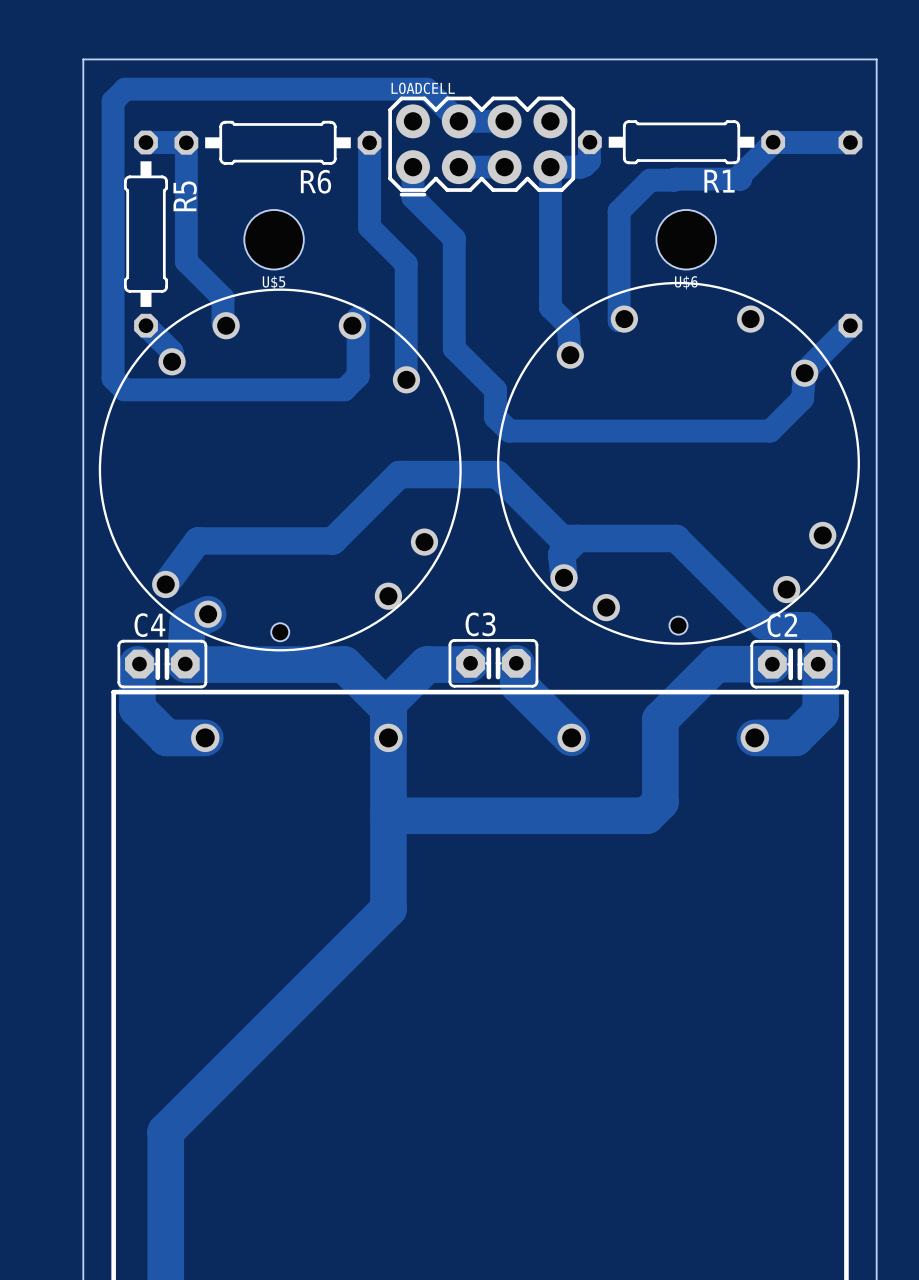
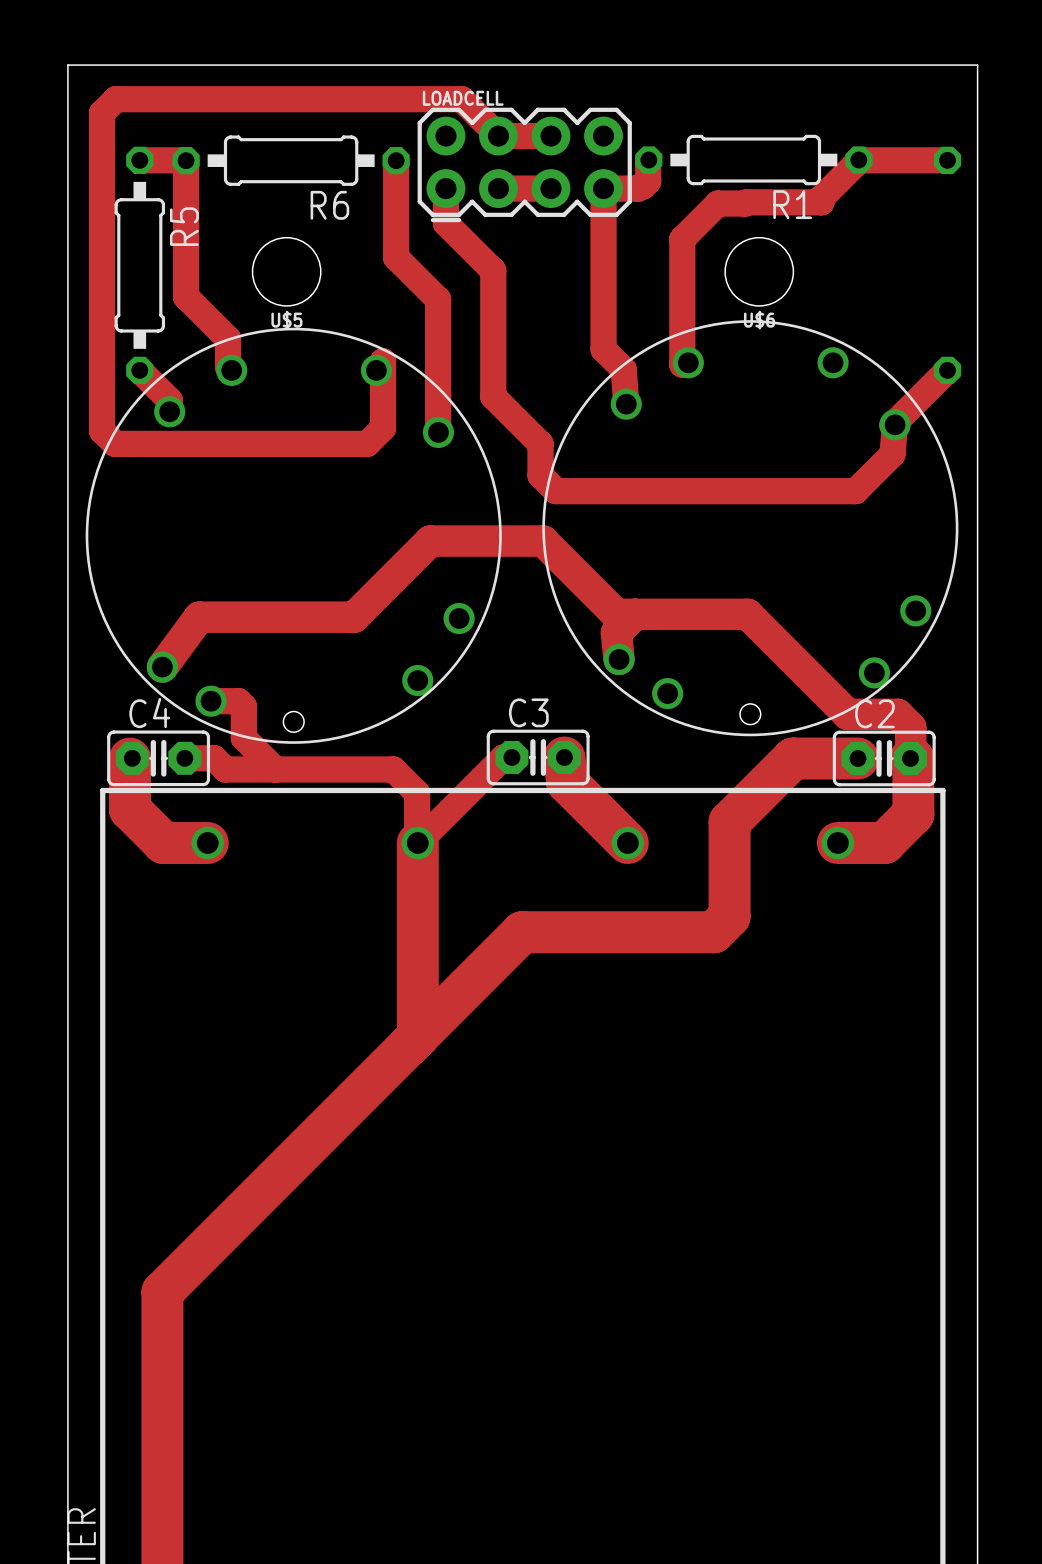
track: (208, 614) (187, 623) (185, 664) (344, 664) (388, 708) -> (211, 701) (238, 701) (243, 706) (243, 737) (275, 769)
track: (470, 663) (426, 664) (388, 702) (388, 737) -> (511, 757) (503, 757) (417, 843) (417, 793) (393, 769) (225, 769) (214, 758) (184, 758)
track: (388, 815) (479, 815) -> none
track: (388, 906) (388, 909) (165, 1131) -> (522, 932) (162, 1291) (162, 1294)

